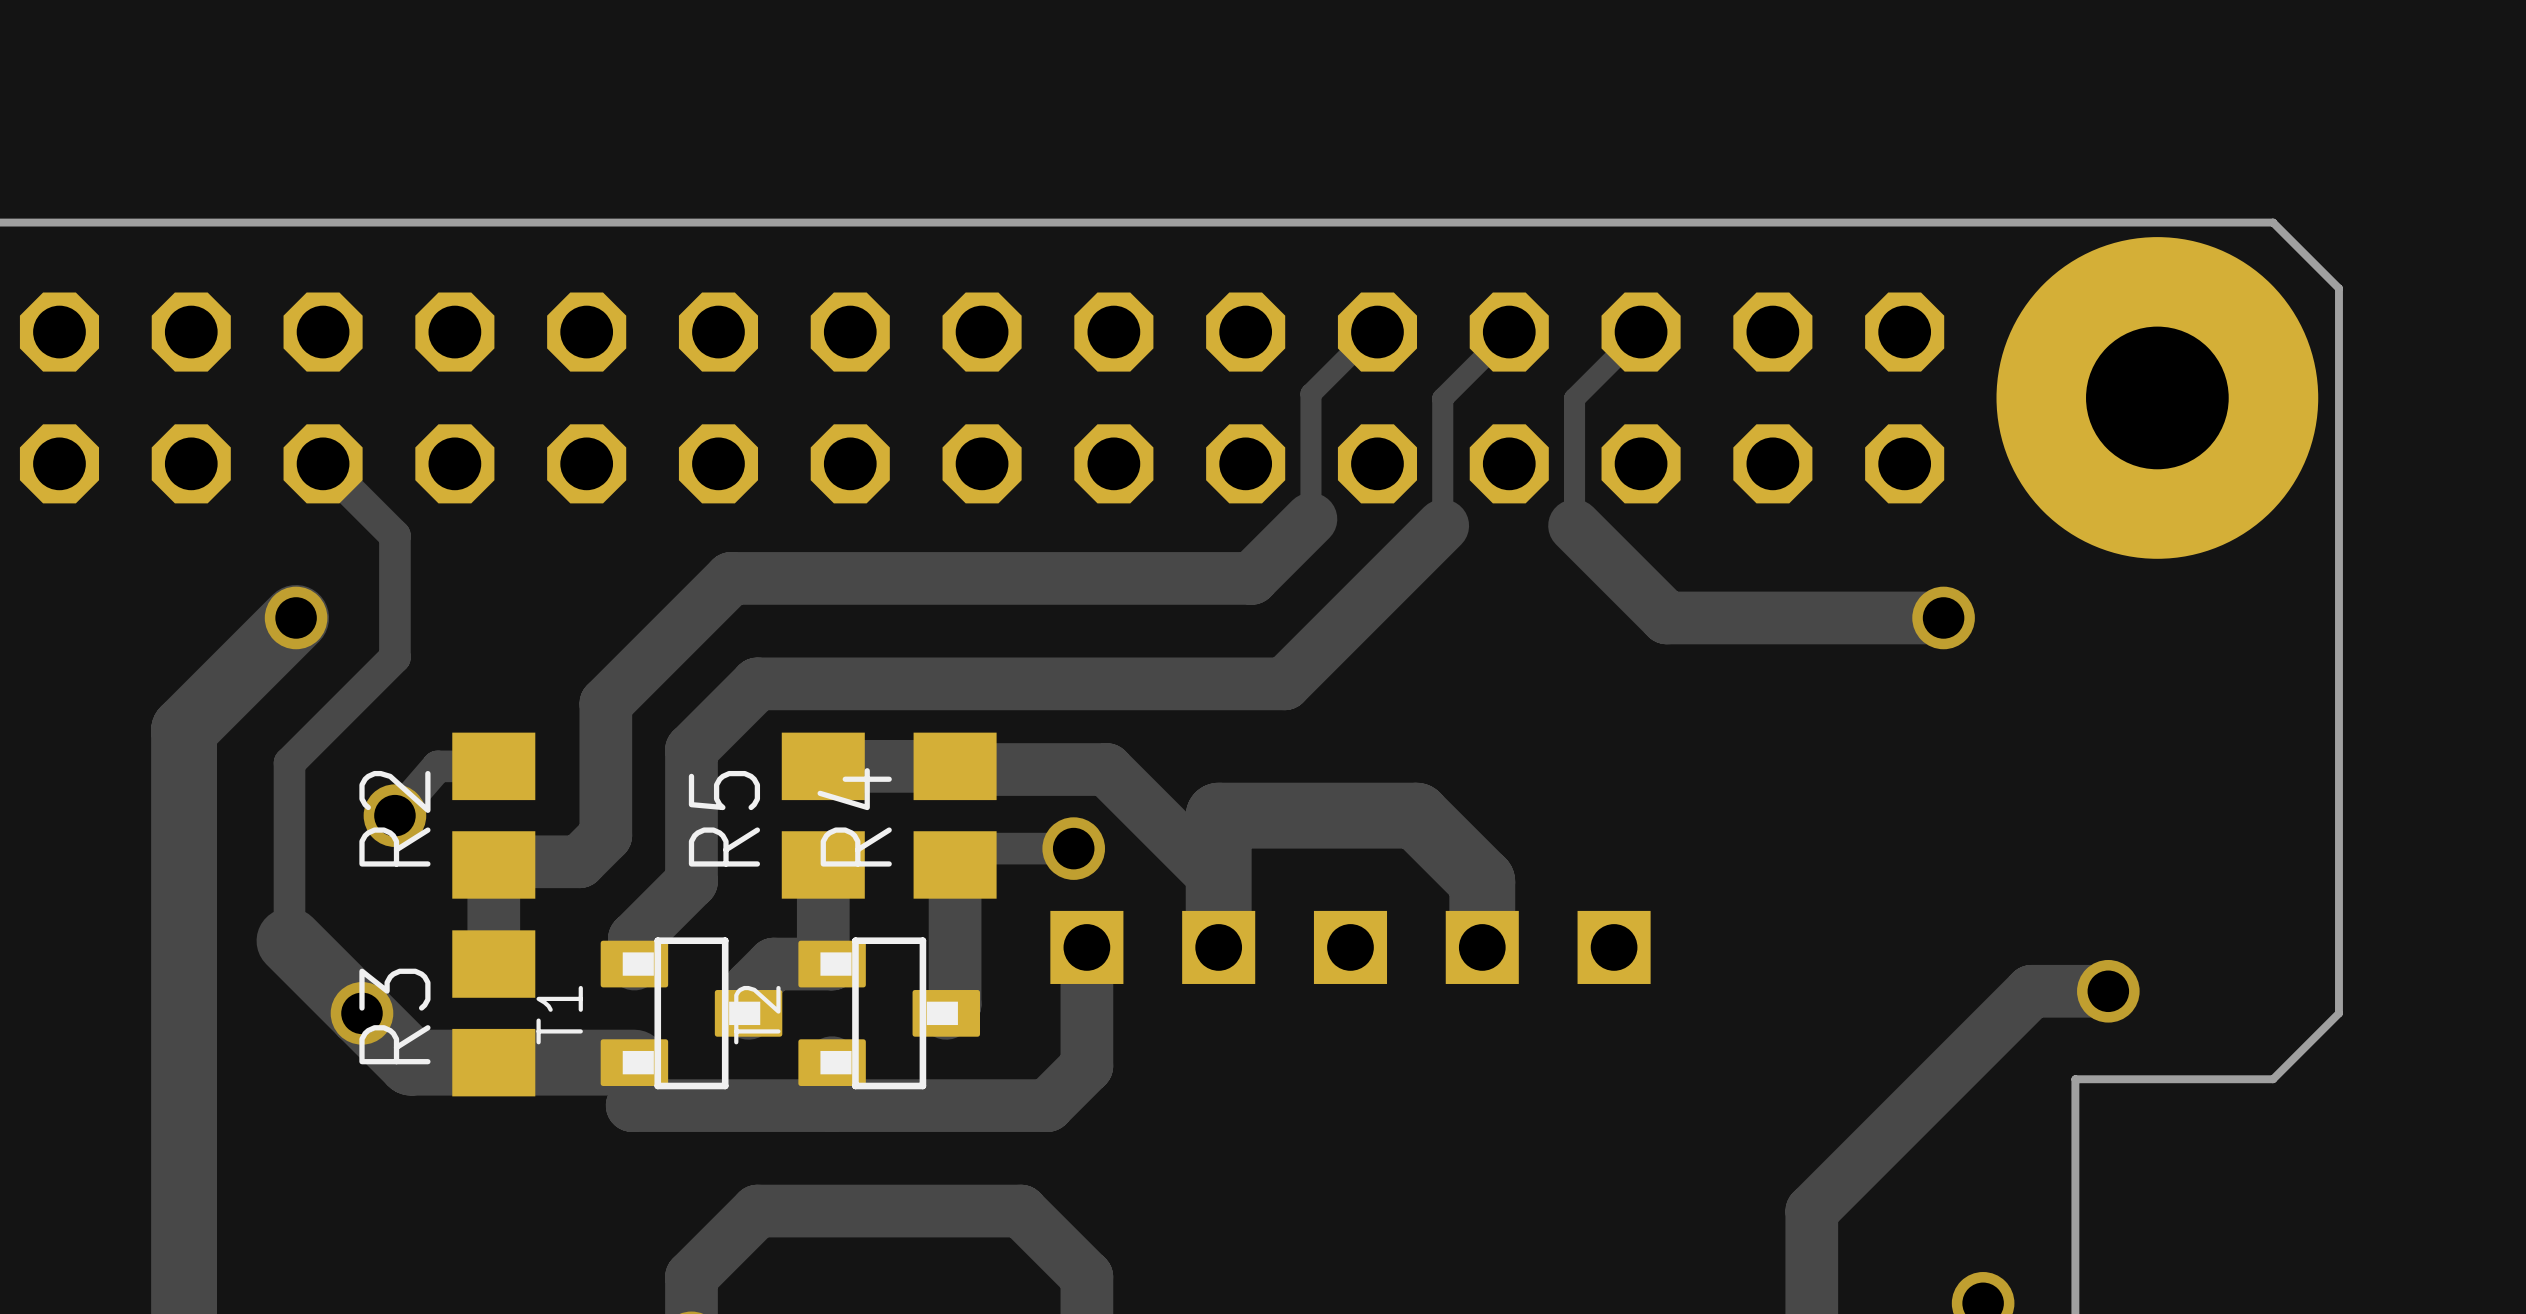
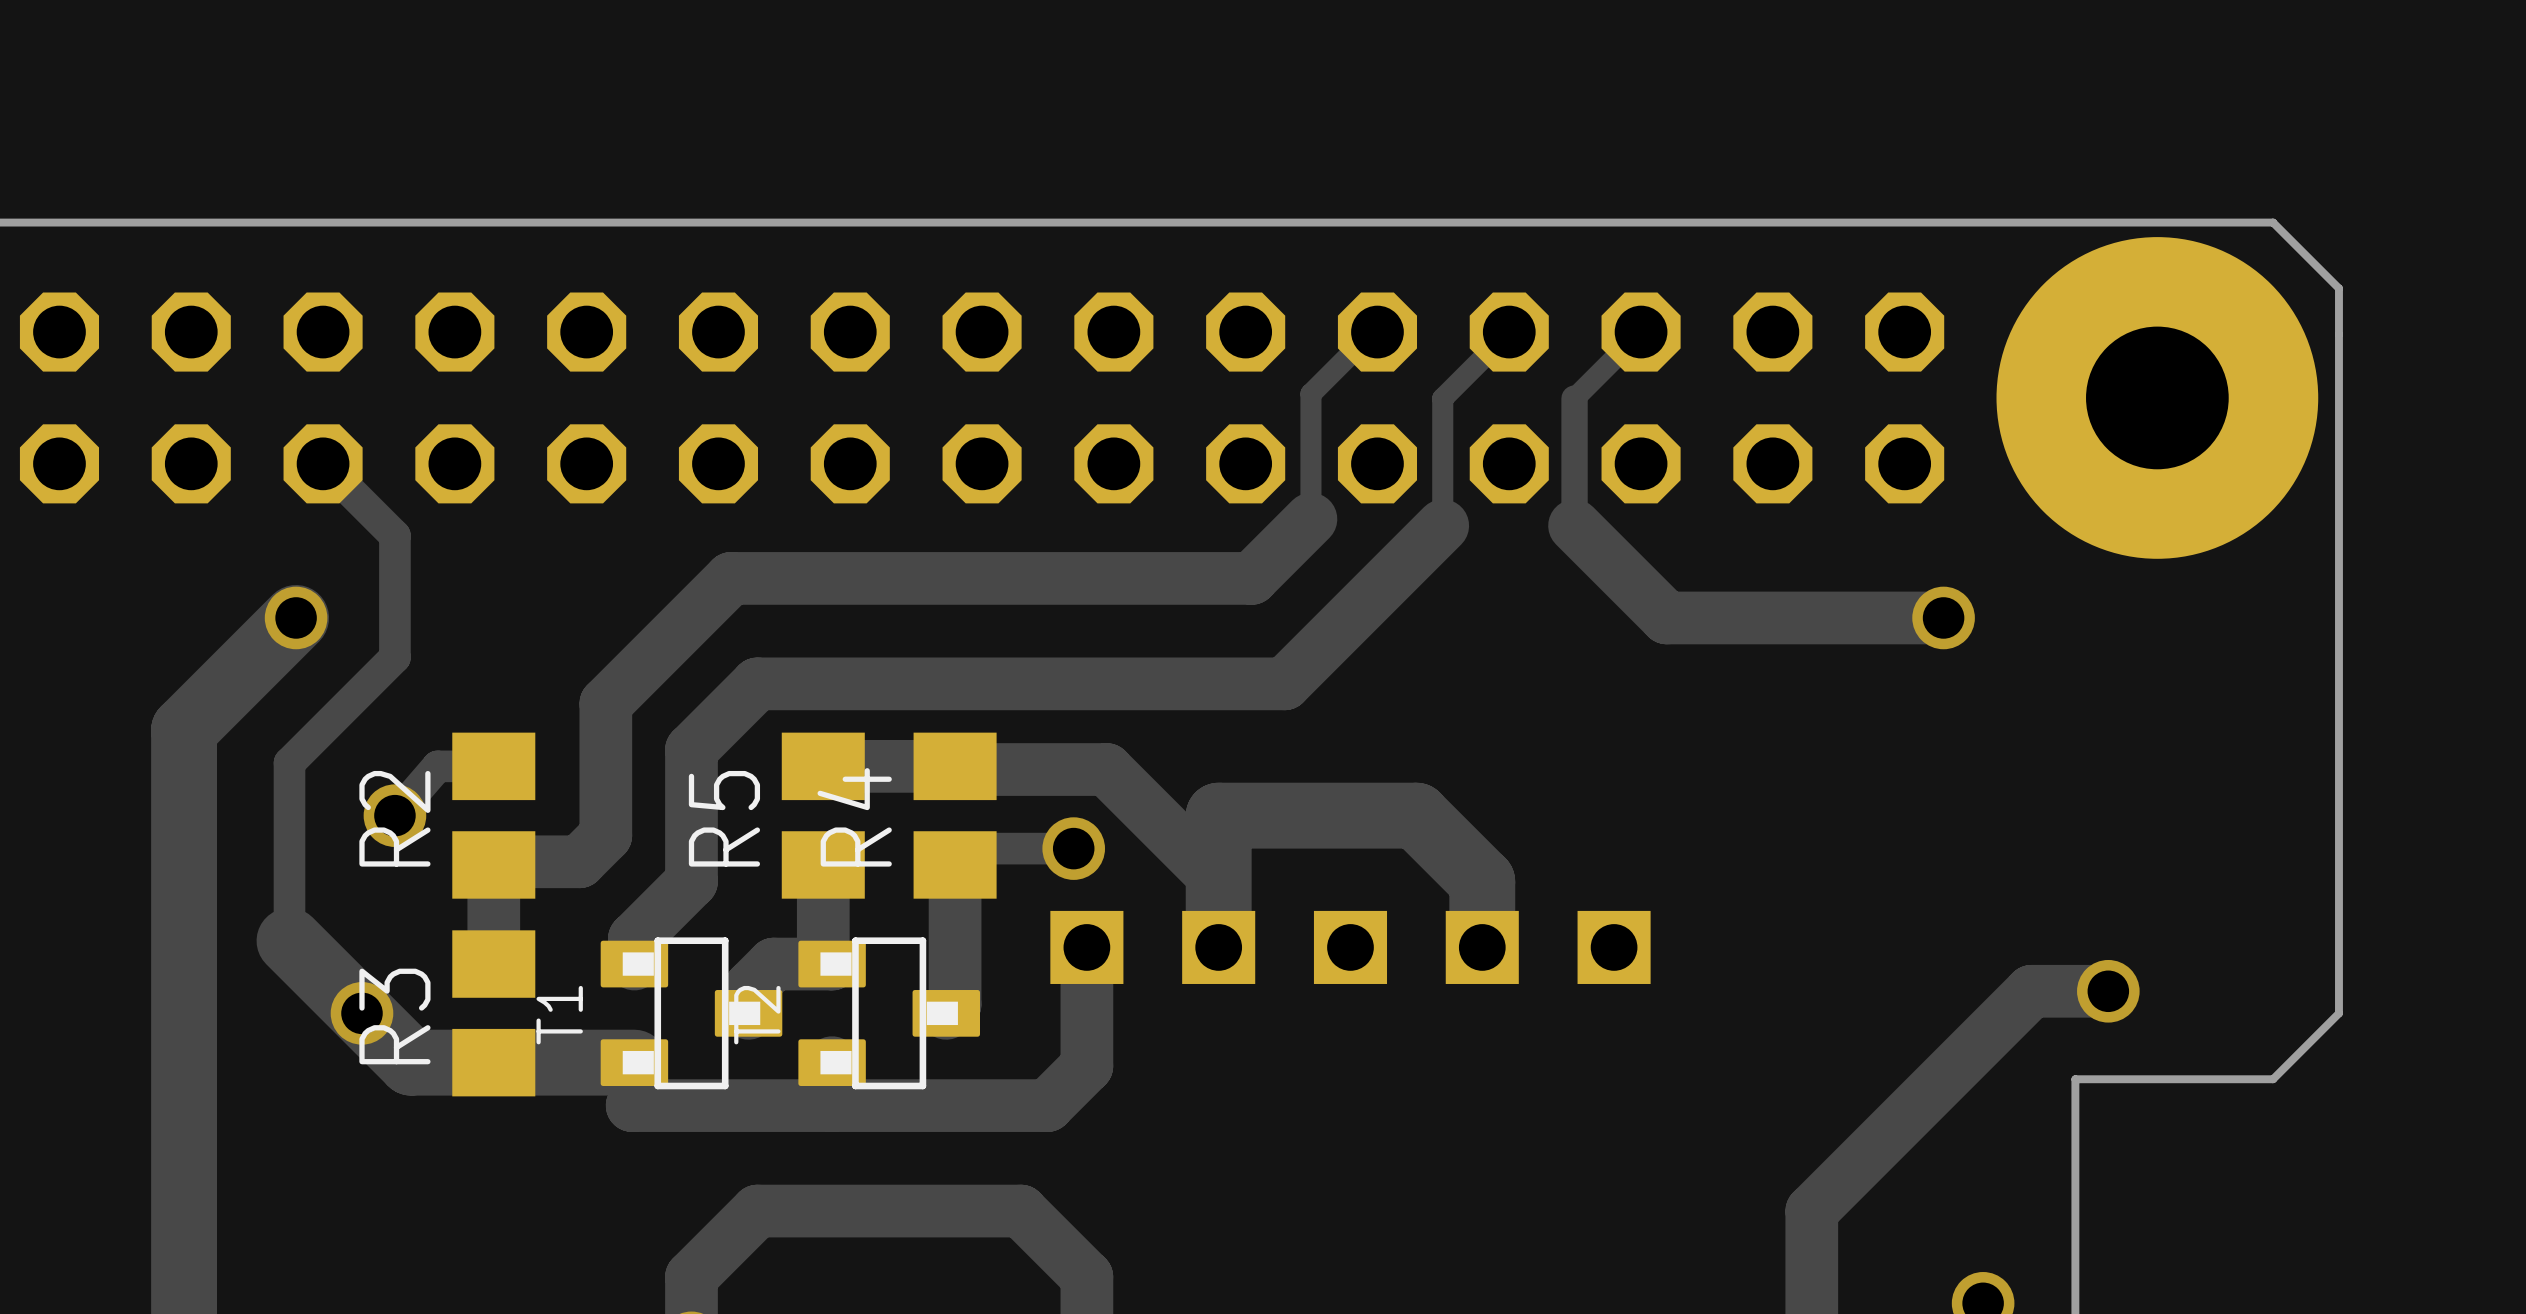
track width: thin (1574, 398) (1574, 525) -> thick (1574, 398) (1574, 525)

